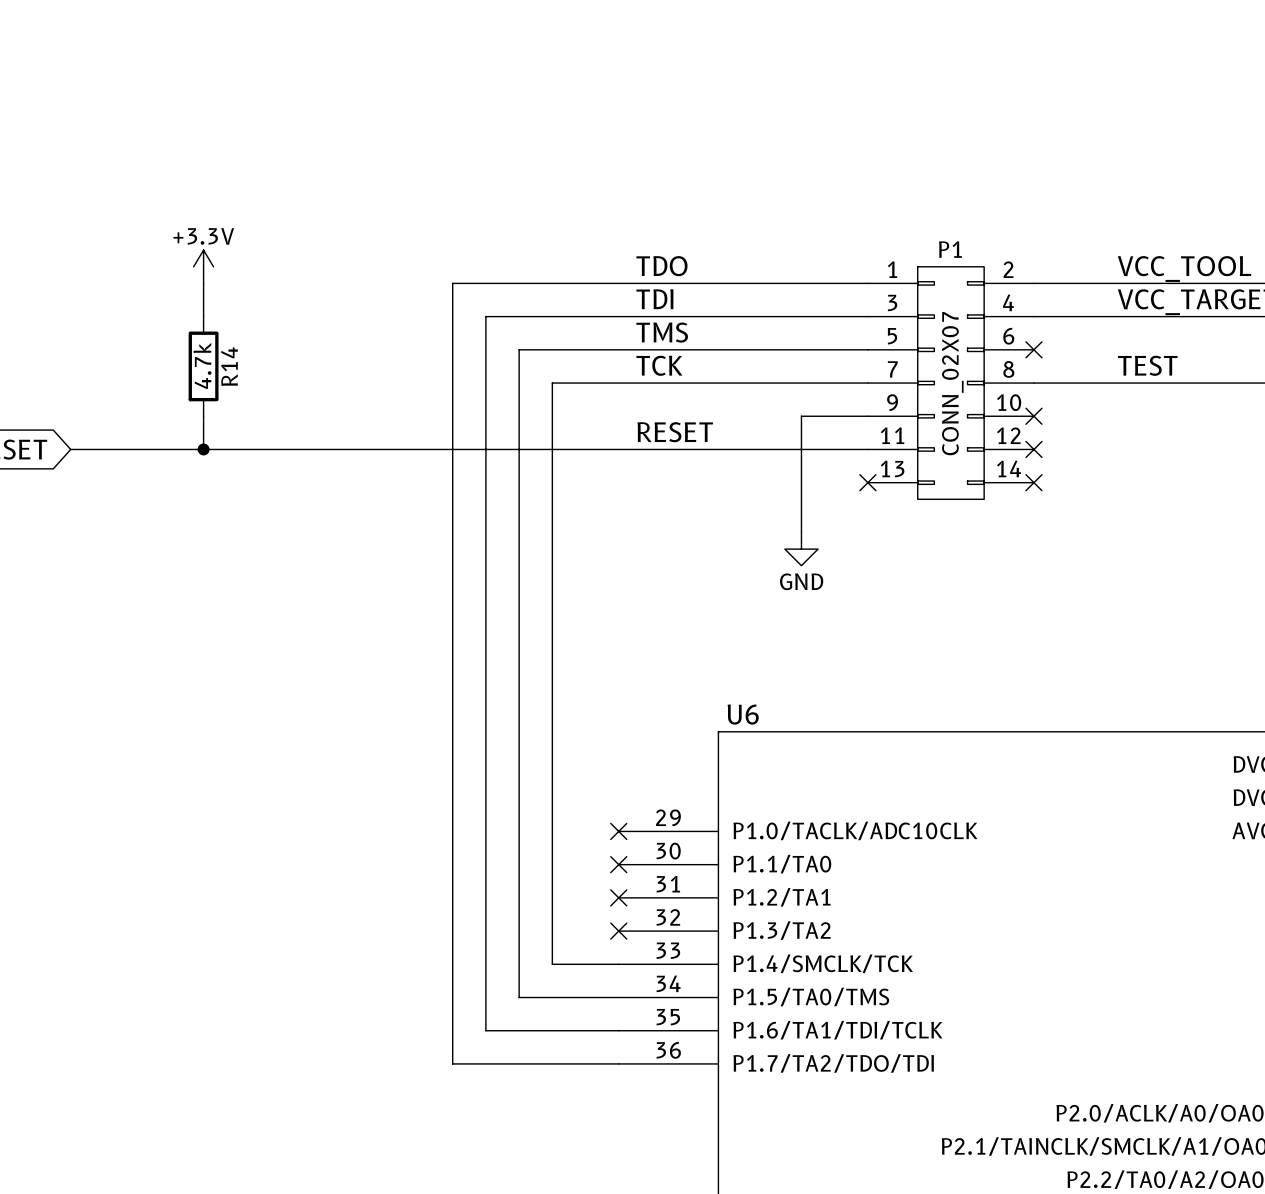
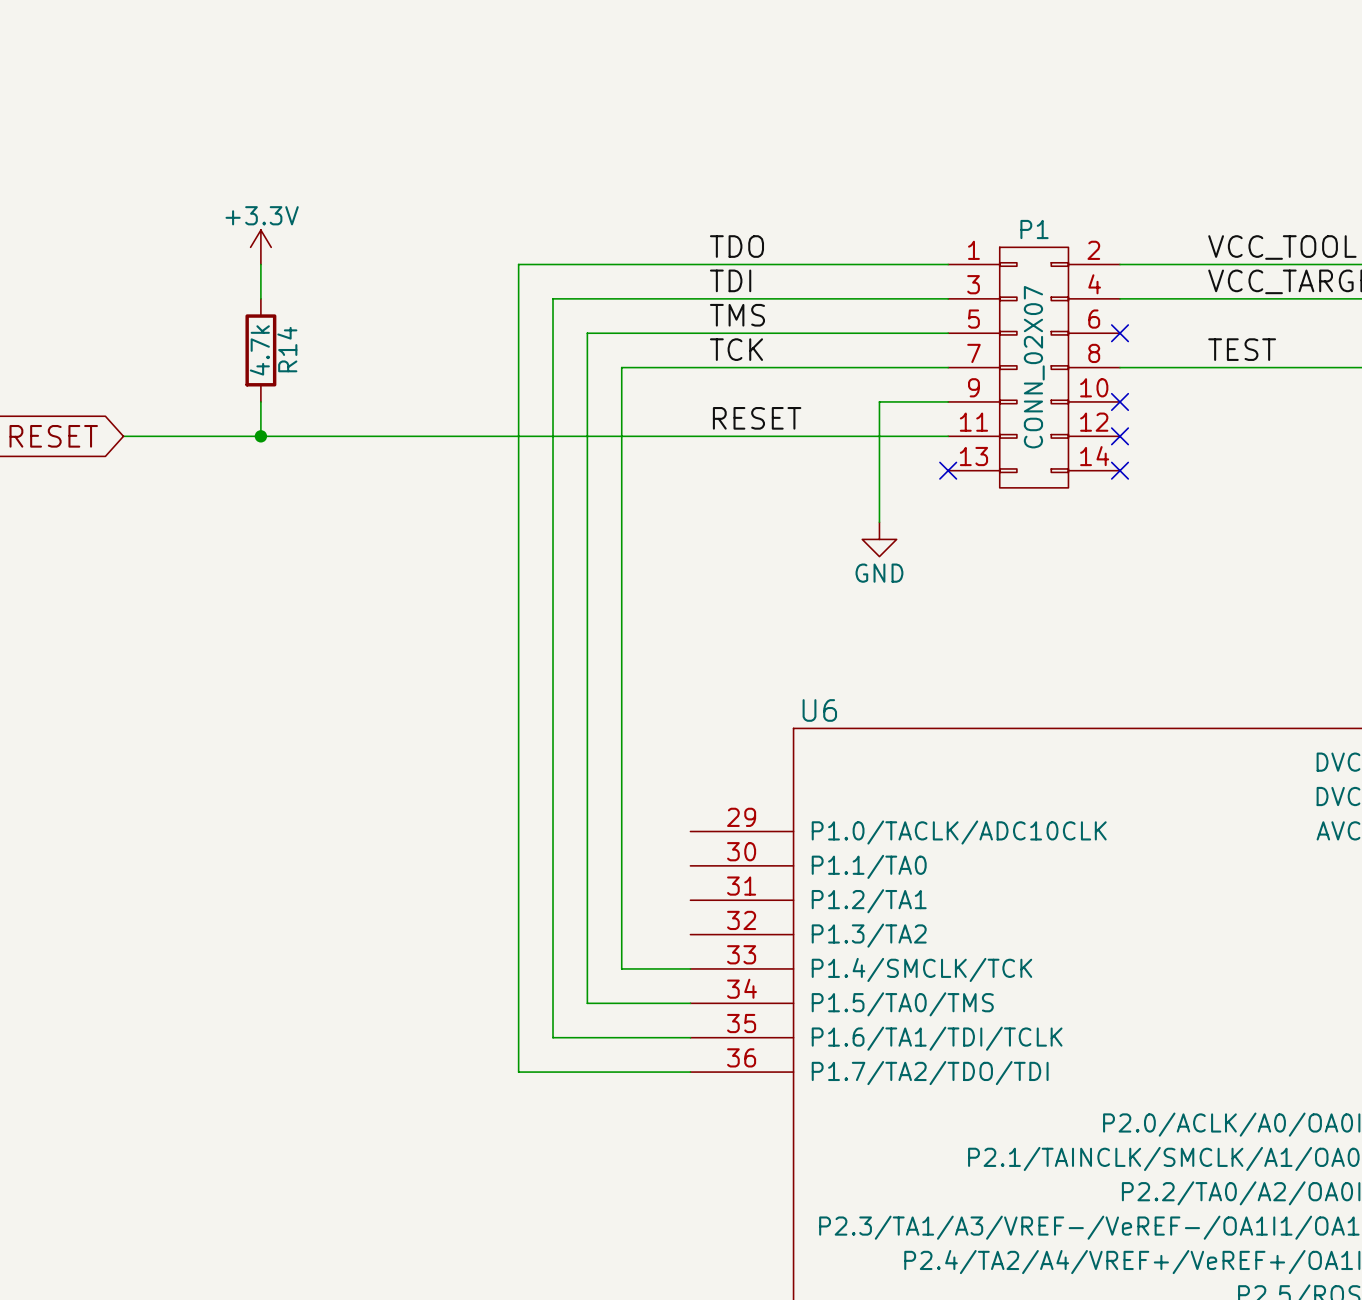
no-connect mark: (618, 831) -> none
no-connect mark: (618, 864) -> none
no-connect mark: (618, 897) -> none
no-connect mark: (618, 931) -> none

